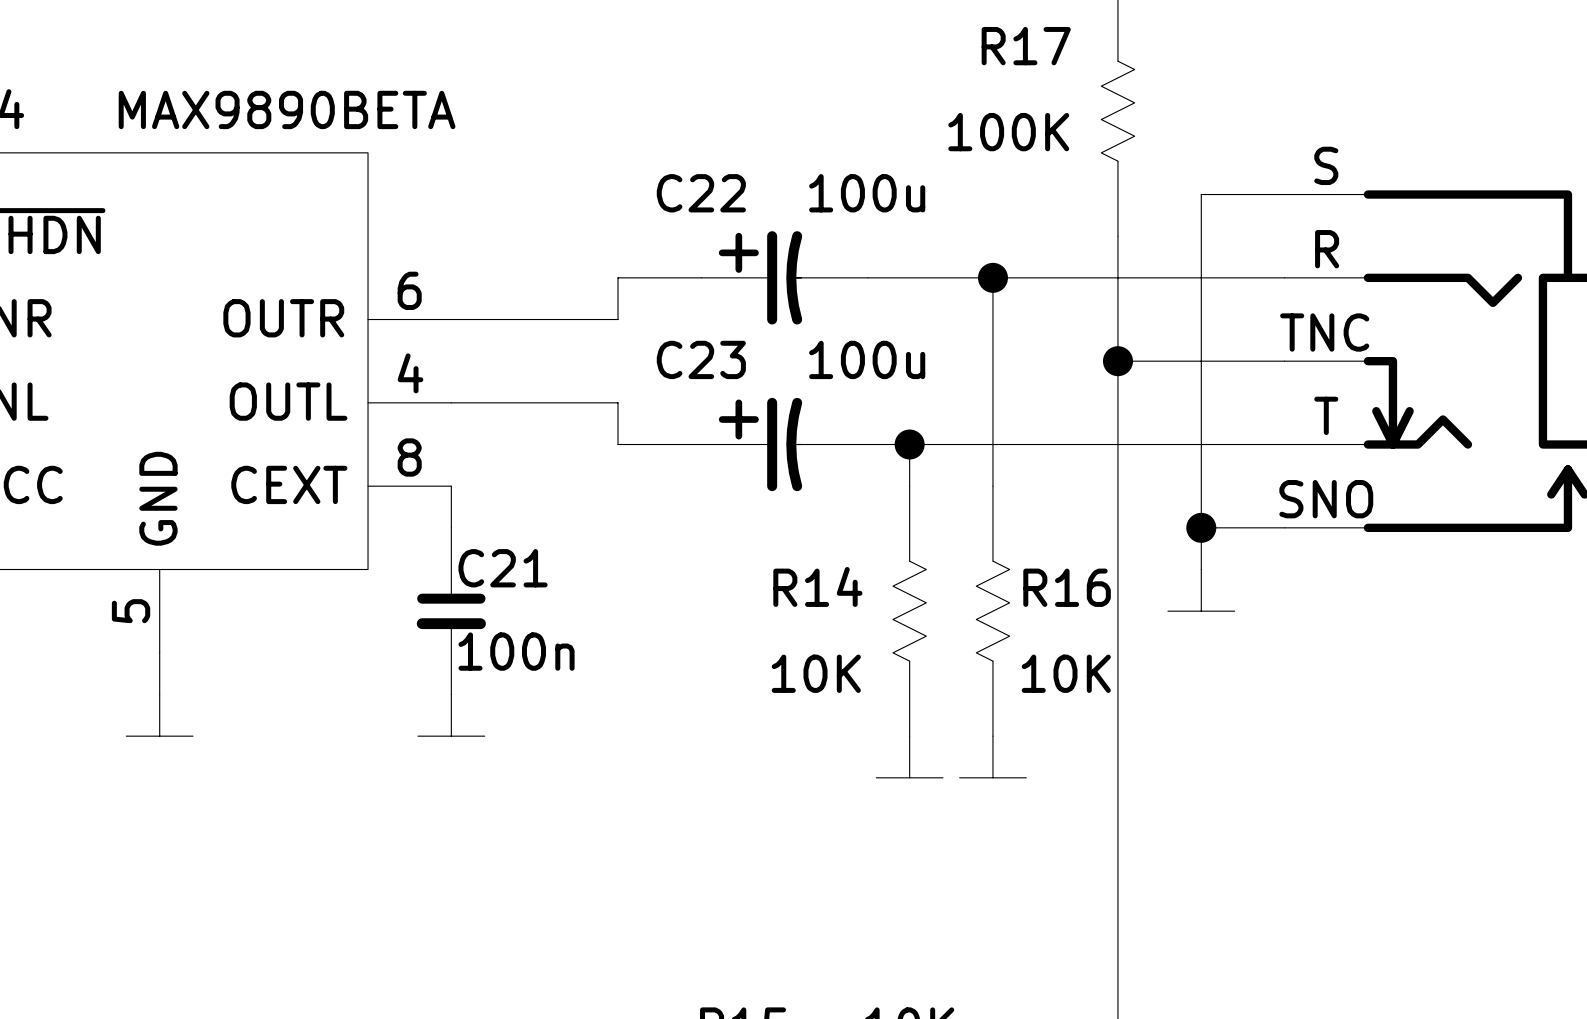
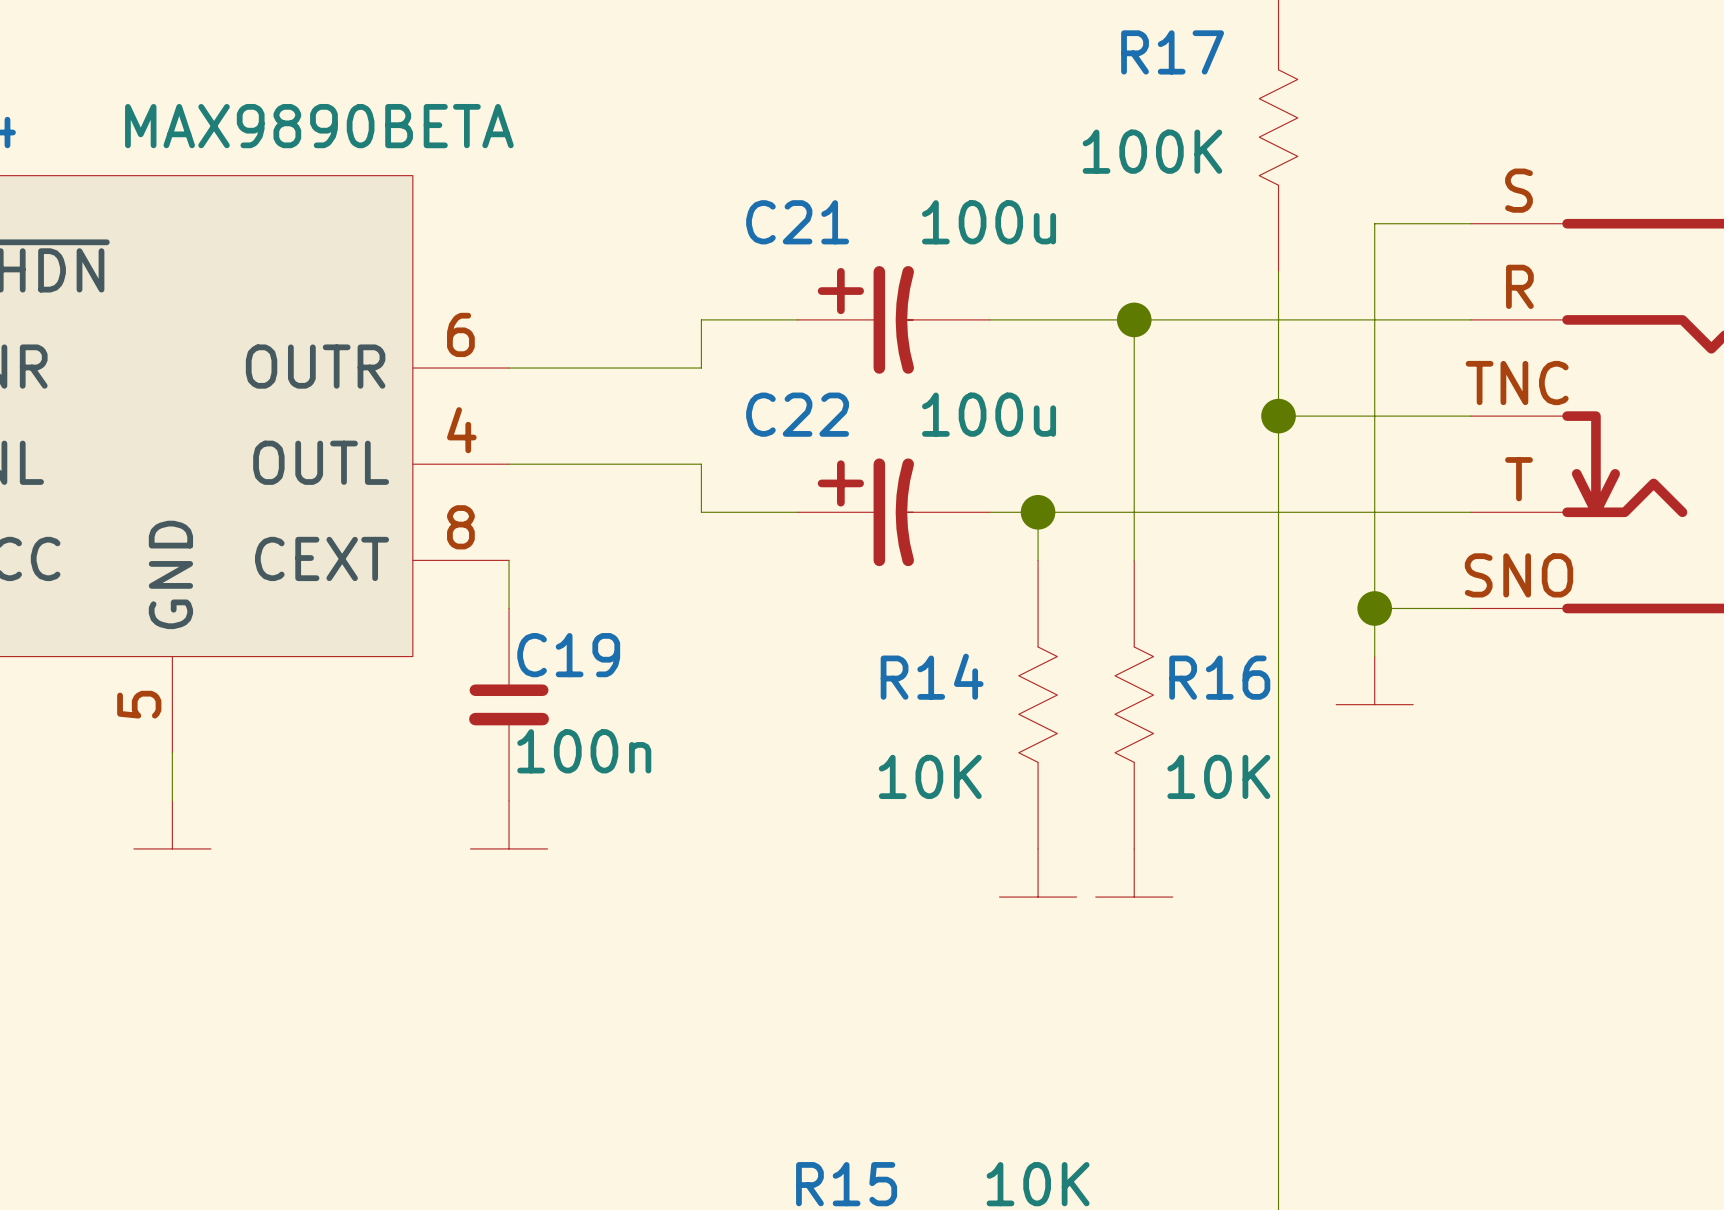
C22 name: C22 (701, 193) -> C21 (797, 222)
C23 name: C23 (701, 359) -> C22 (797, 414)
C21 name: C21 (503, 568) -> C19 (568, 655)

